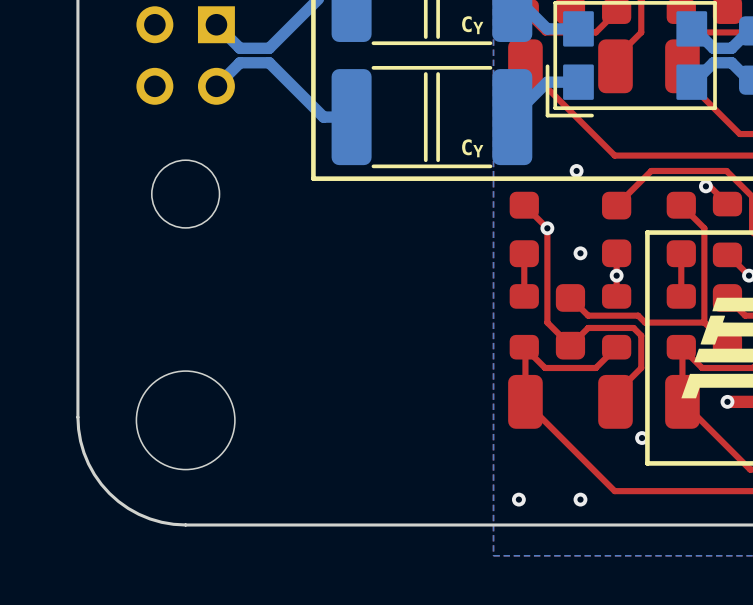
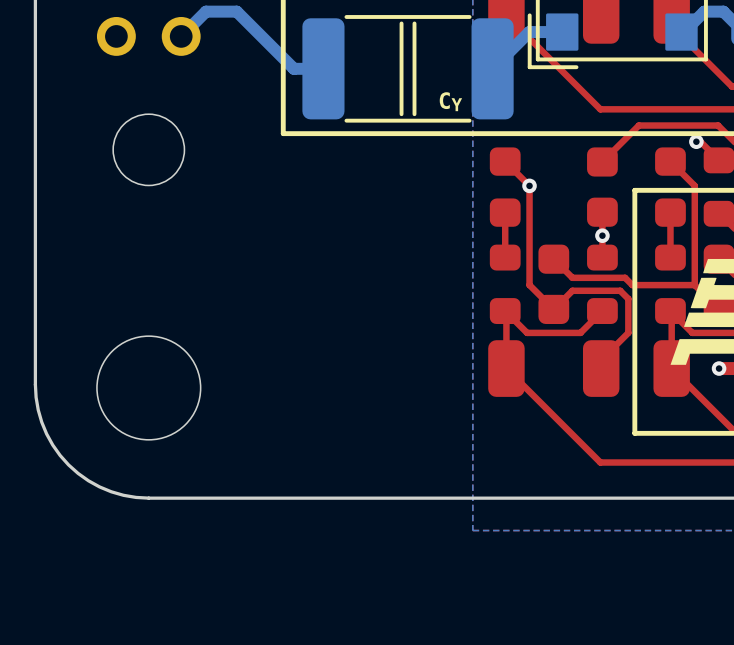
via: (576, 170) -> none
via: (580, 253) -> none
via: (642, 438) -> none
via: (518, 499) -> none
via: (580, 499) -> none

